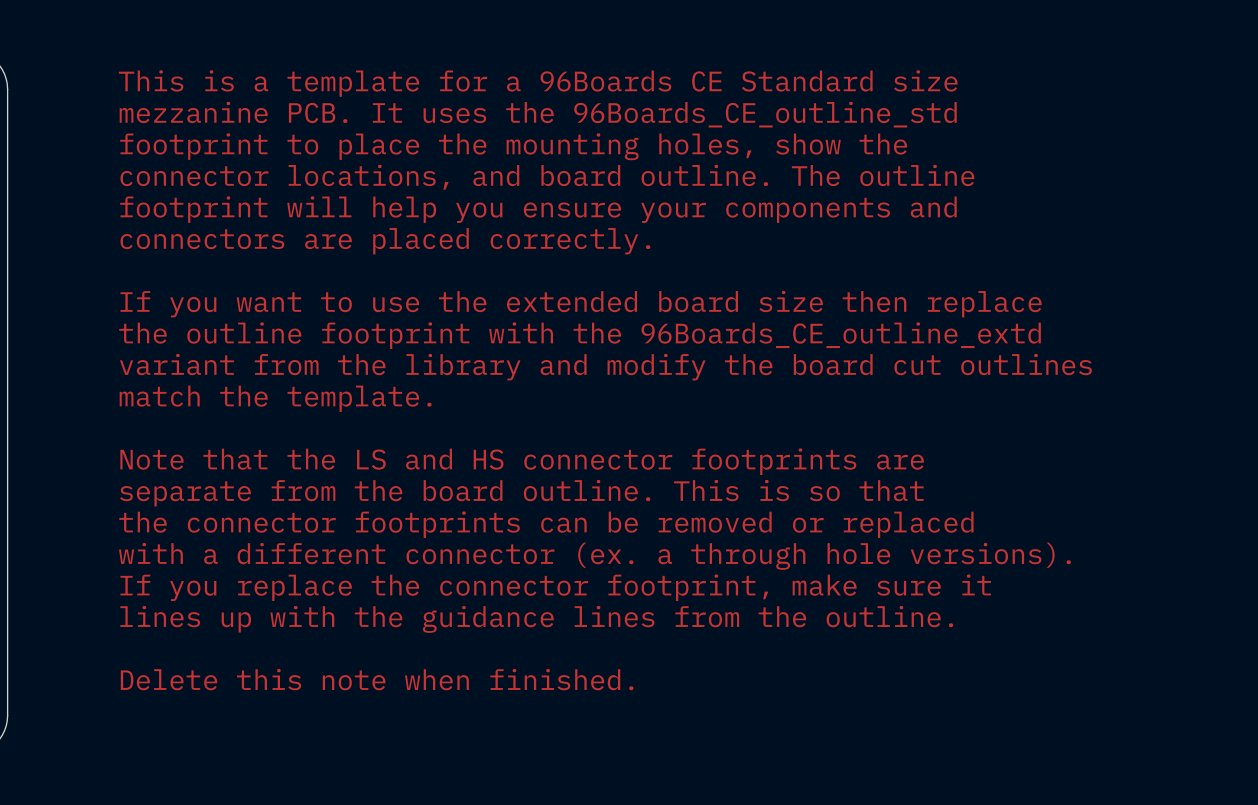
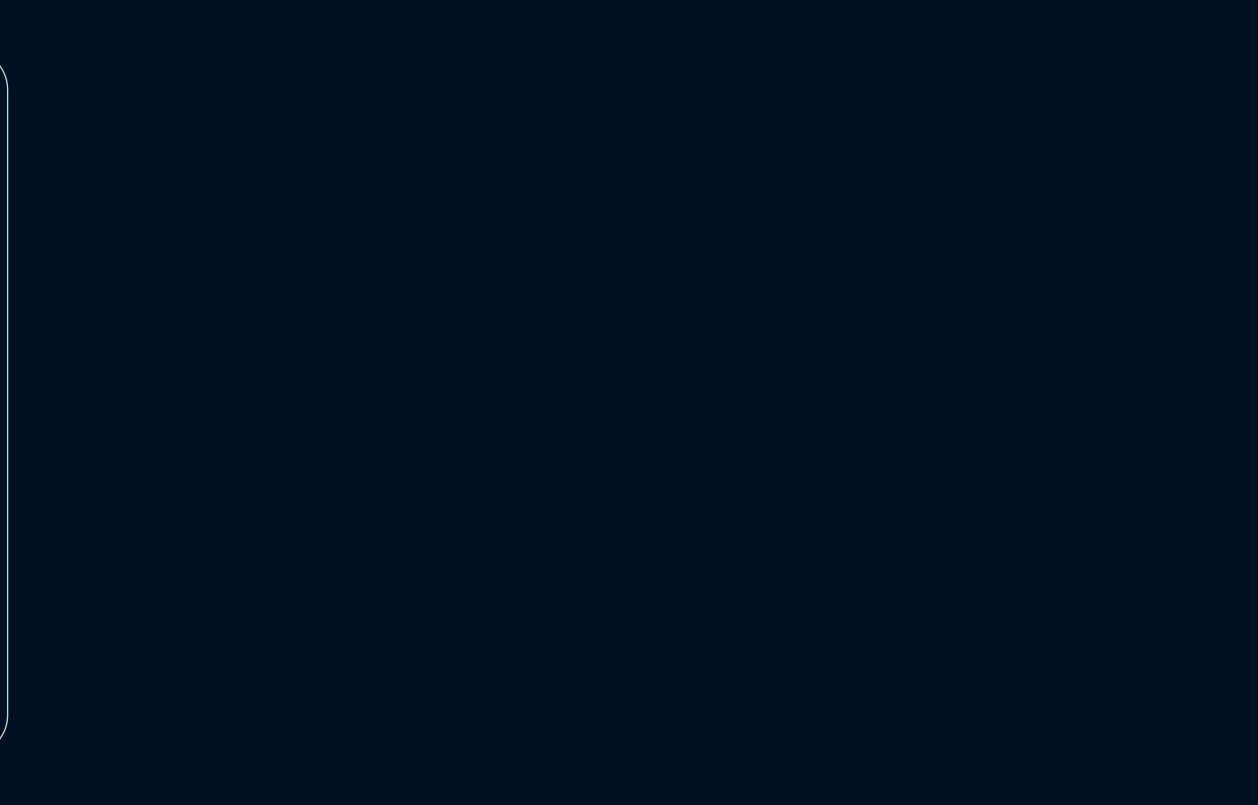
text: This is a template for a 96Boards CE Standard size (538, 83) -> none
text: mezzanine PCB. It uses the 96Boards_CE_outline_std (538, 114) -> none
text: footprint to place the mounting holes, show the (513, 146) -> none
text: connector locations, and board outline. The outline (547, 177) -> none
text: footprint will help you ensure your components and (538, 209) -> none
text: connectors are placed correctly. (385, 241) -> none
text: If you want to use the extended board size then replace (581, 304) -> none
text: the outline footprint with the 96Boards_CE_outline_extd (580, 335) -> none
text: variant from the library and modify the board cut outlines (605, 367) -> none
text: match the template. (275, 398) -> none
text: Note that the LS and HS connector footprints are (522, 461) -> none
text: separate from the board outline. This is so that (521, 493) -> none
text: the connector footprints can be removed or replaced (546, 524) -> none
text: with a different connector (ex. a through hole versions). (594, 556) -> none
text: If you replace the connector footprint, make sure it (555, 587) -> none
text: lines up with the guidance lines from the outline. (536, 619) -> none
text: Delete this note when finished. (377, 679) -> none

